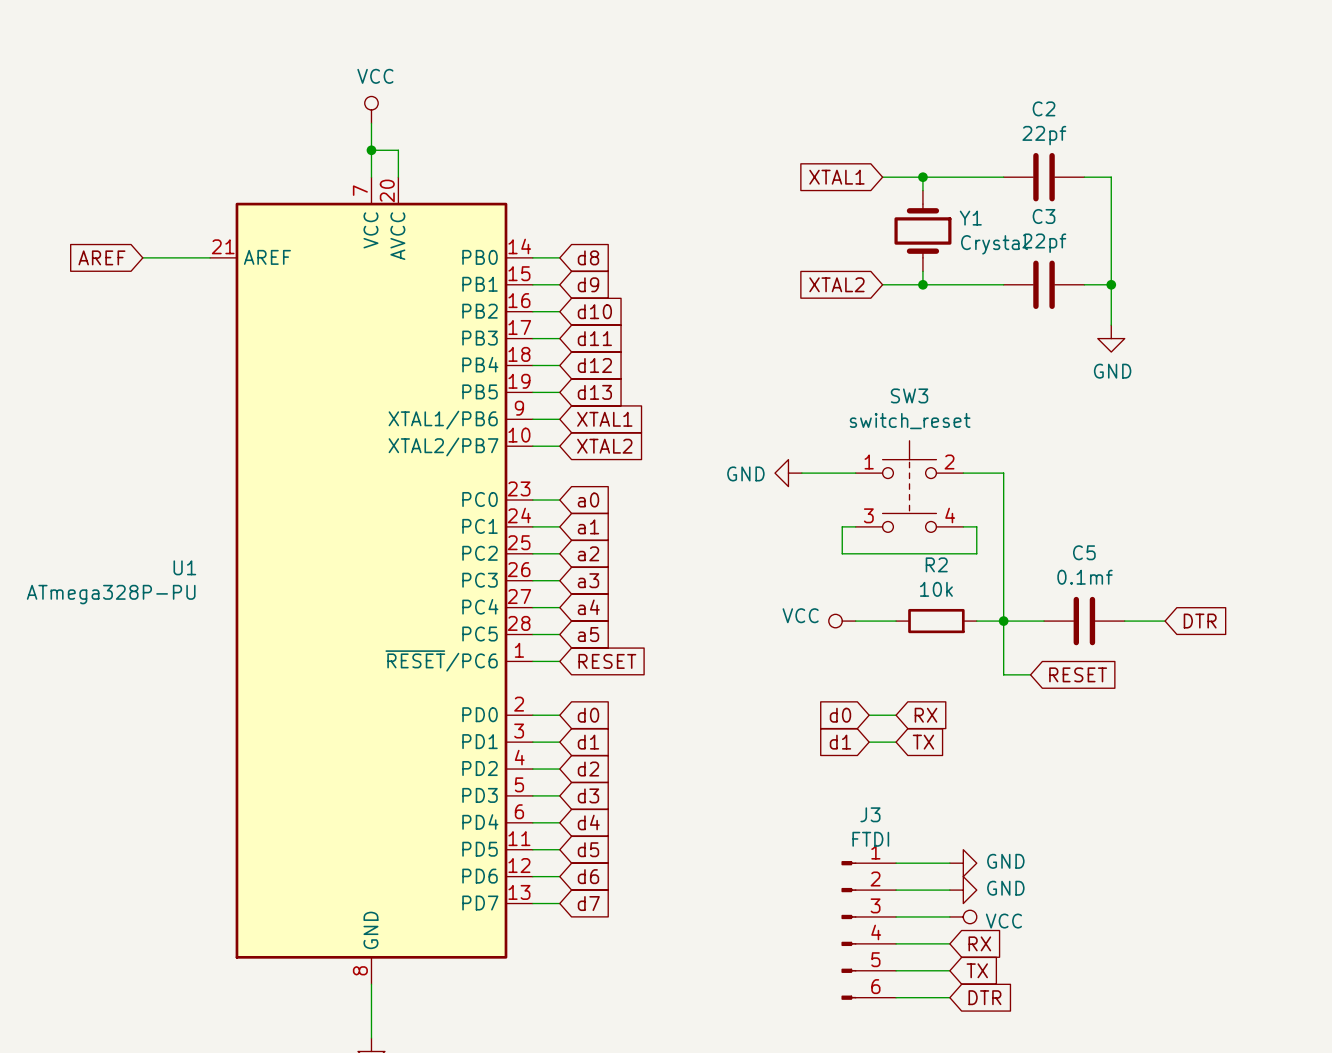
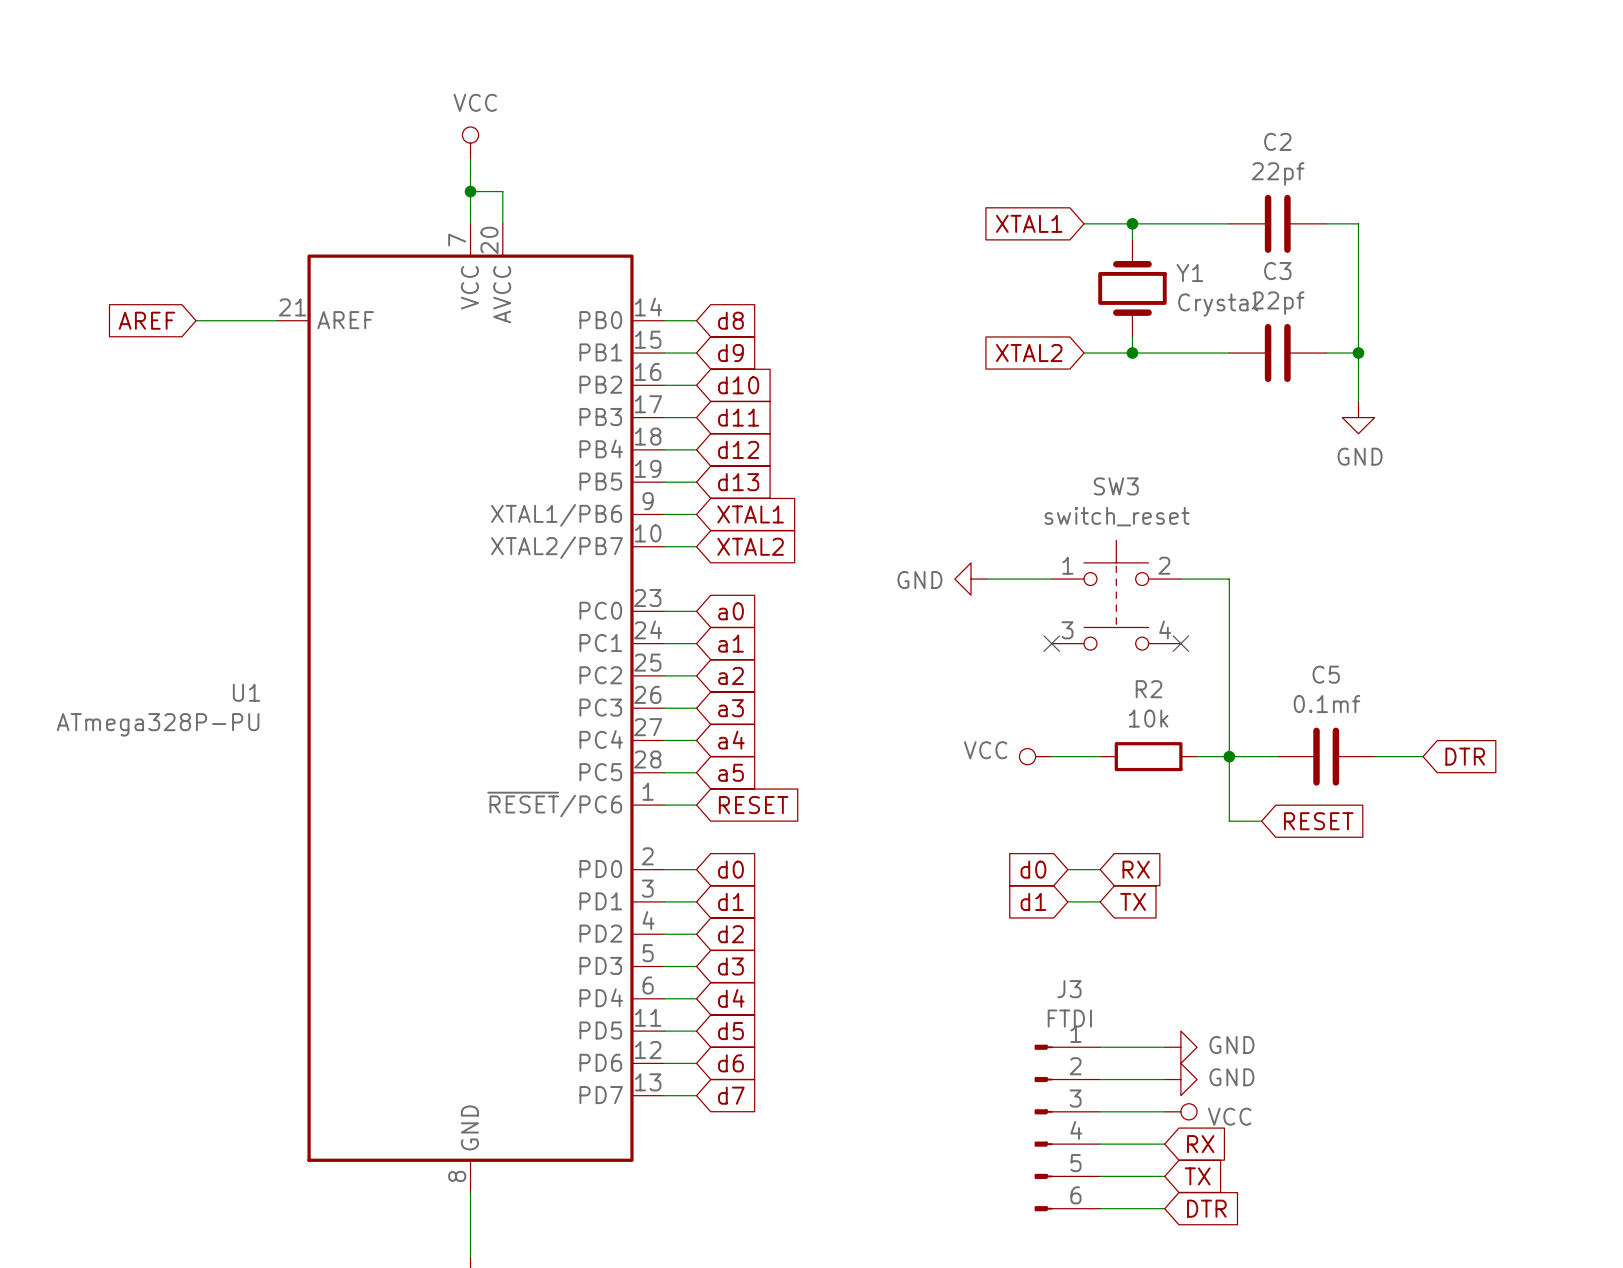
wire: (855, 526) (842, 526) (842, 553) (976, 553) (976, 526) (963, 526) -> none
no-connect mark: none -> (1051, 643)
no-connect mark: none -> (1180, 643)

